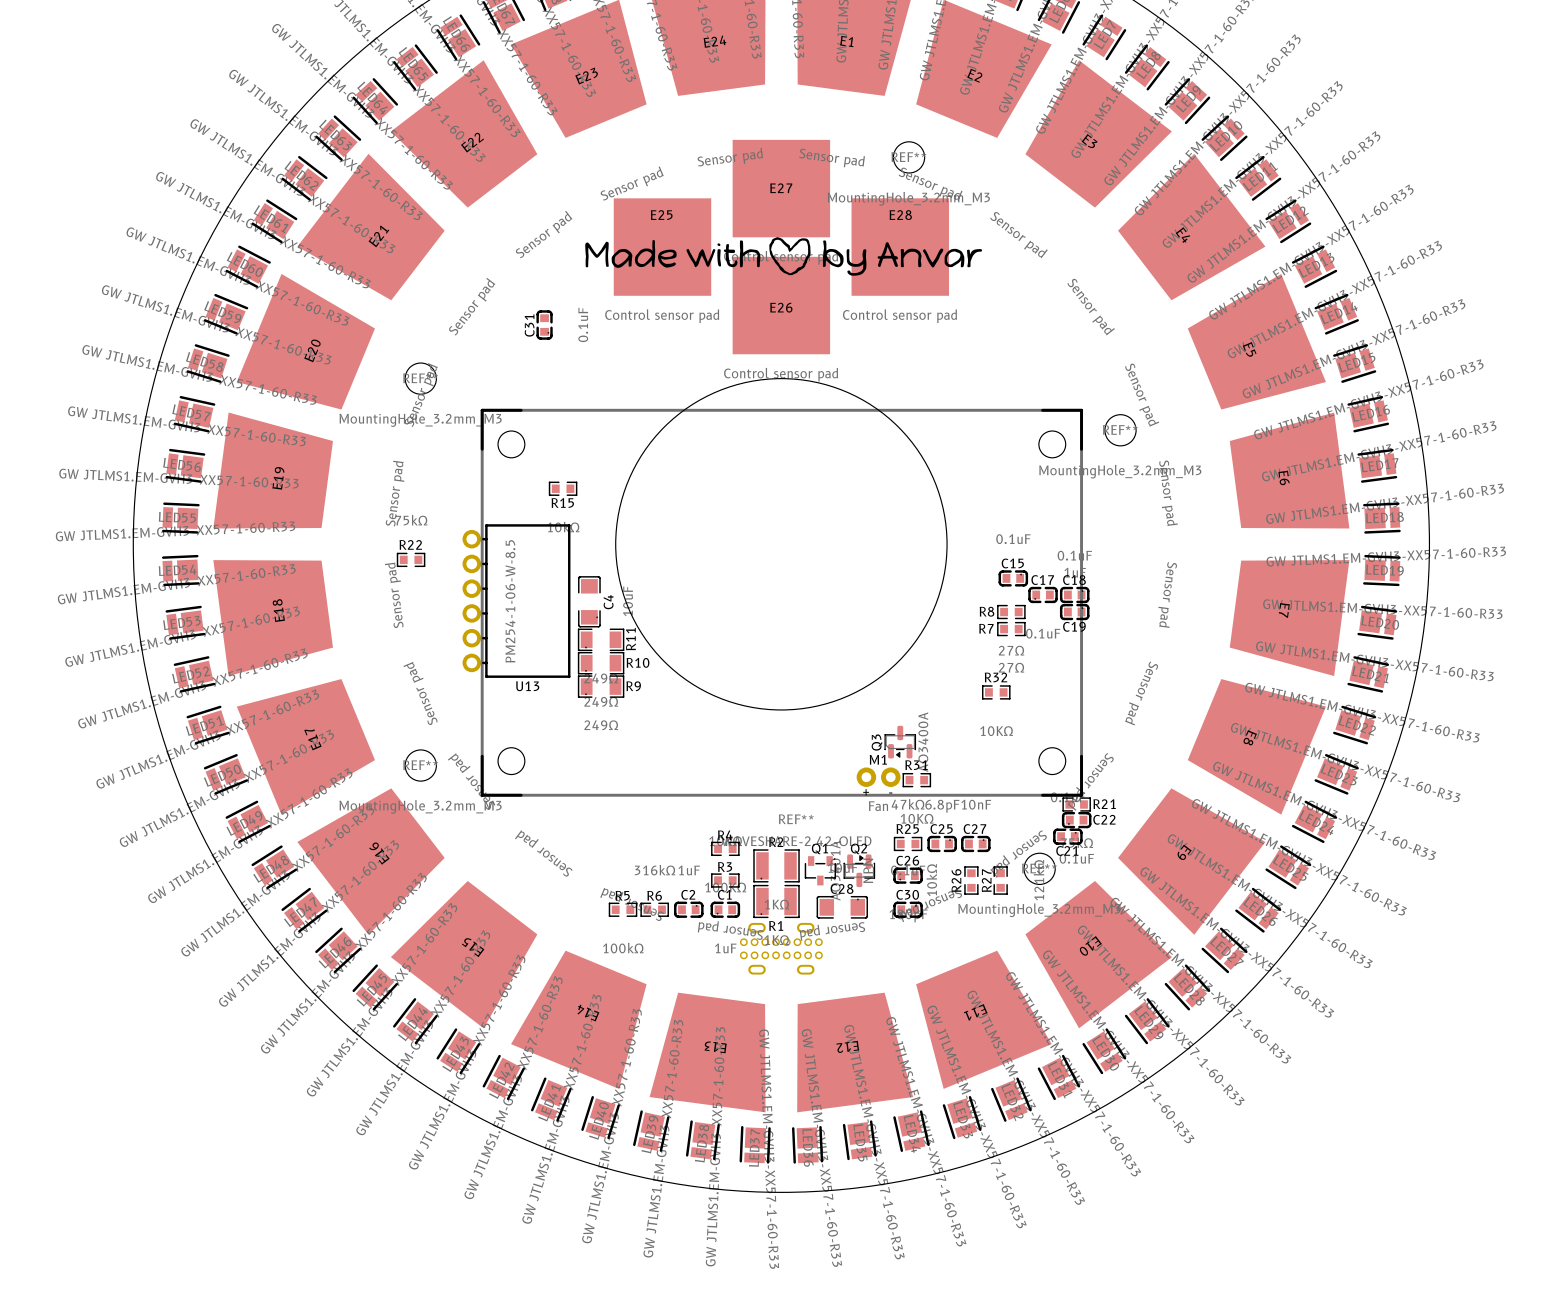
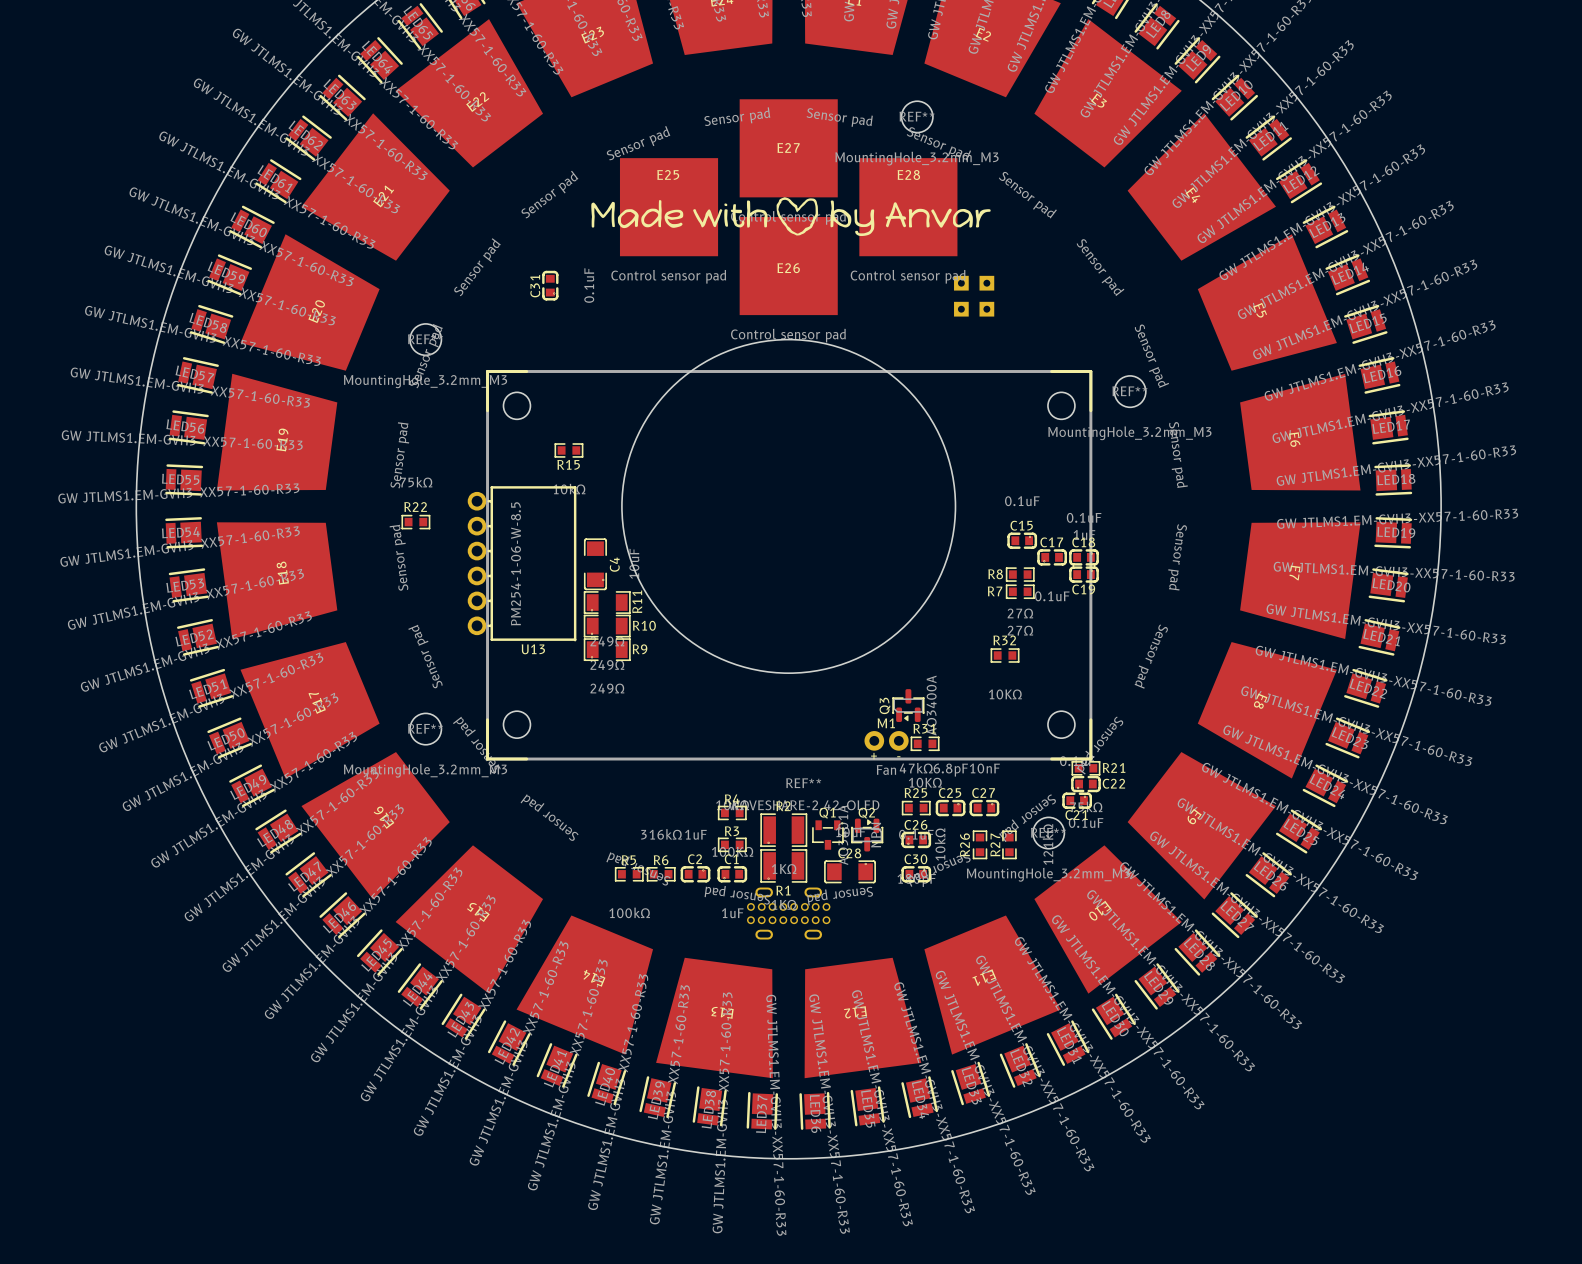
part: none -> (961, 283)
part: none -> (986, 283)
part: none -> (961, 309)
part: none -> (986, 309)

